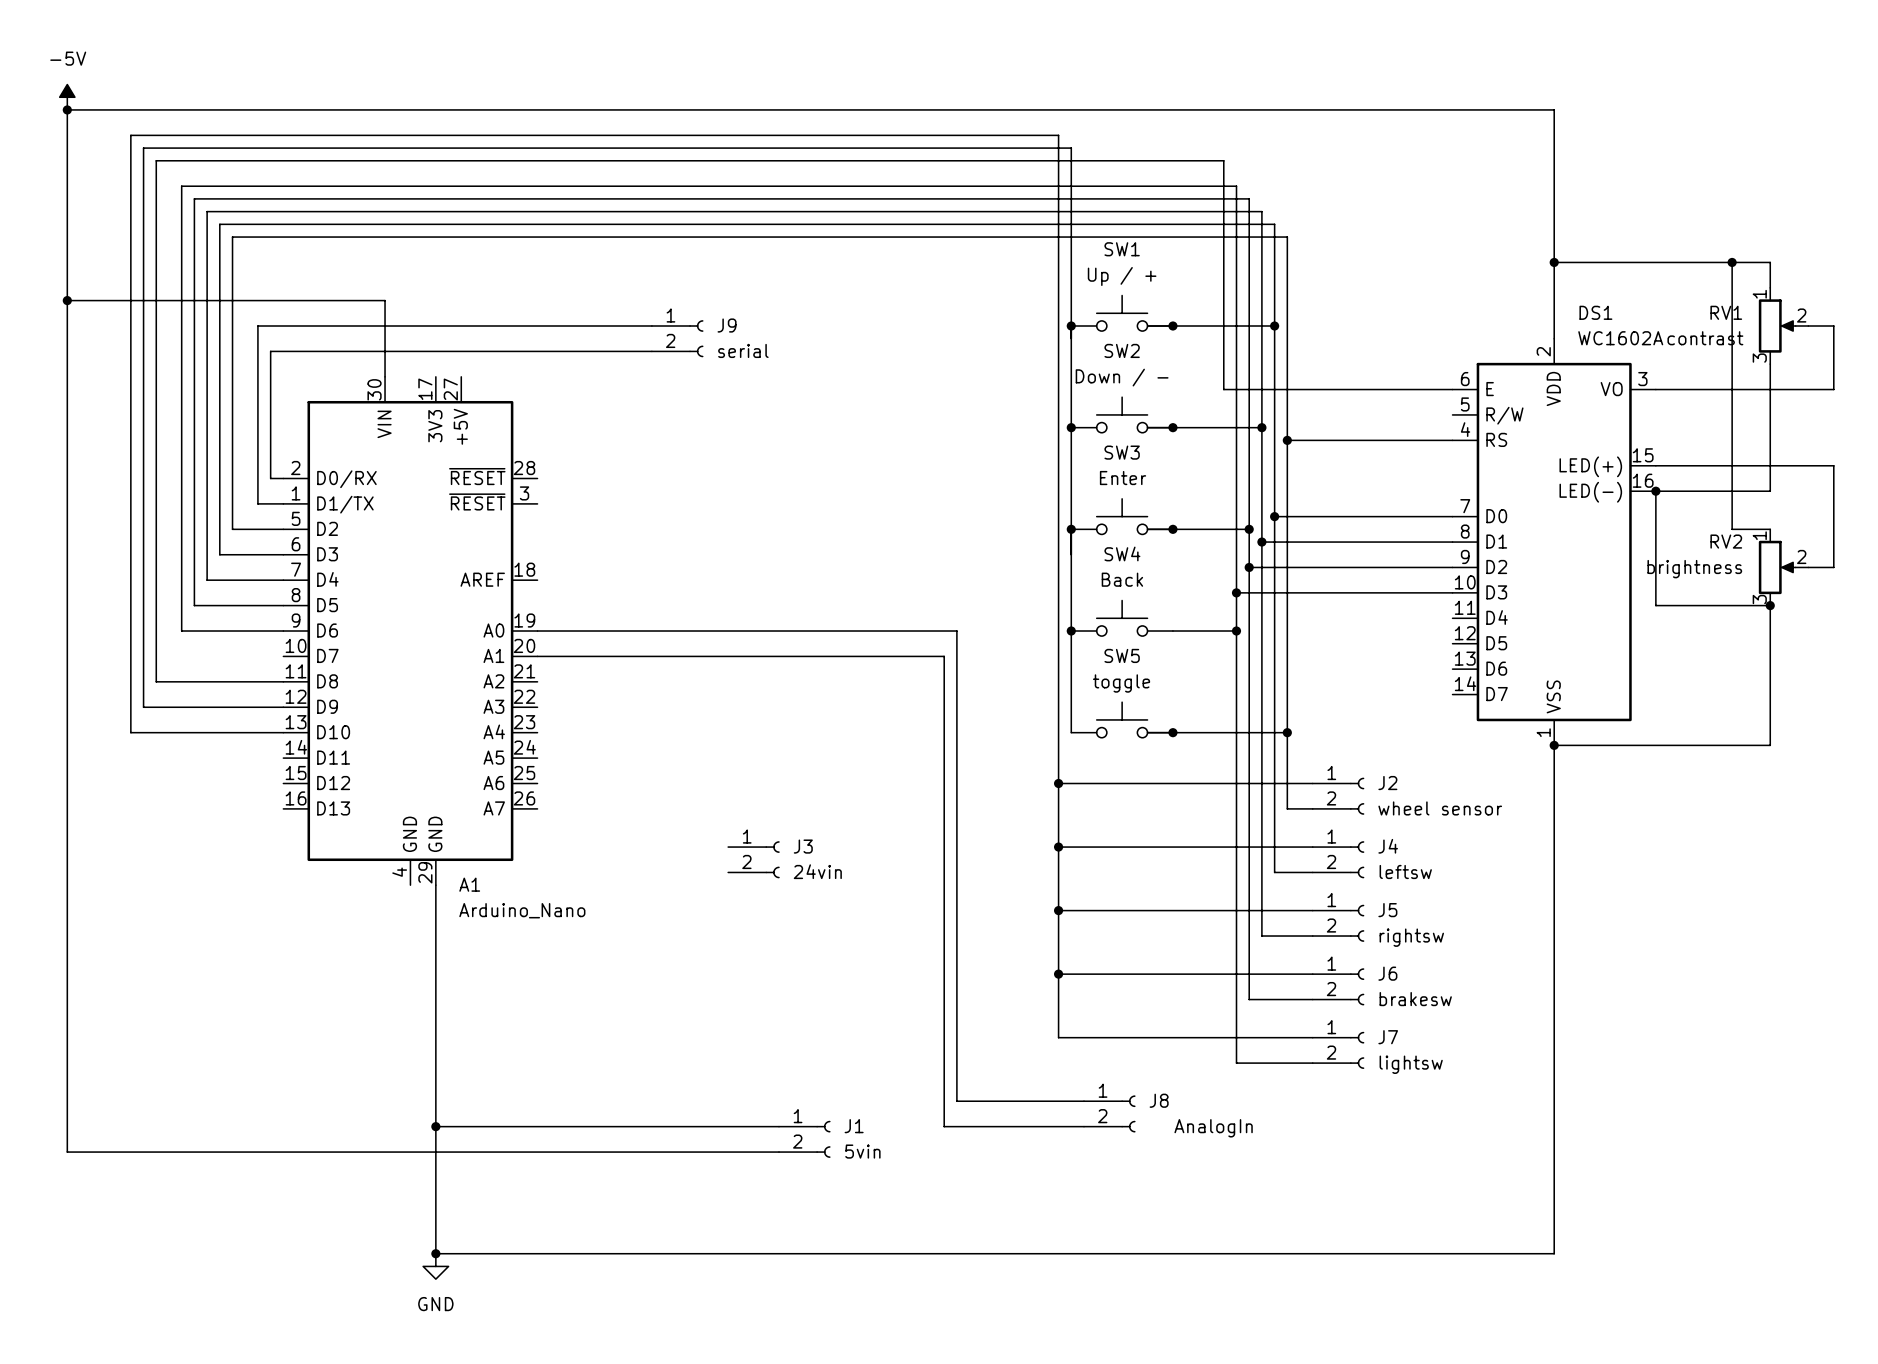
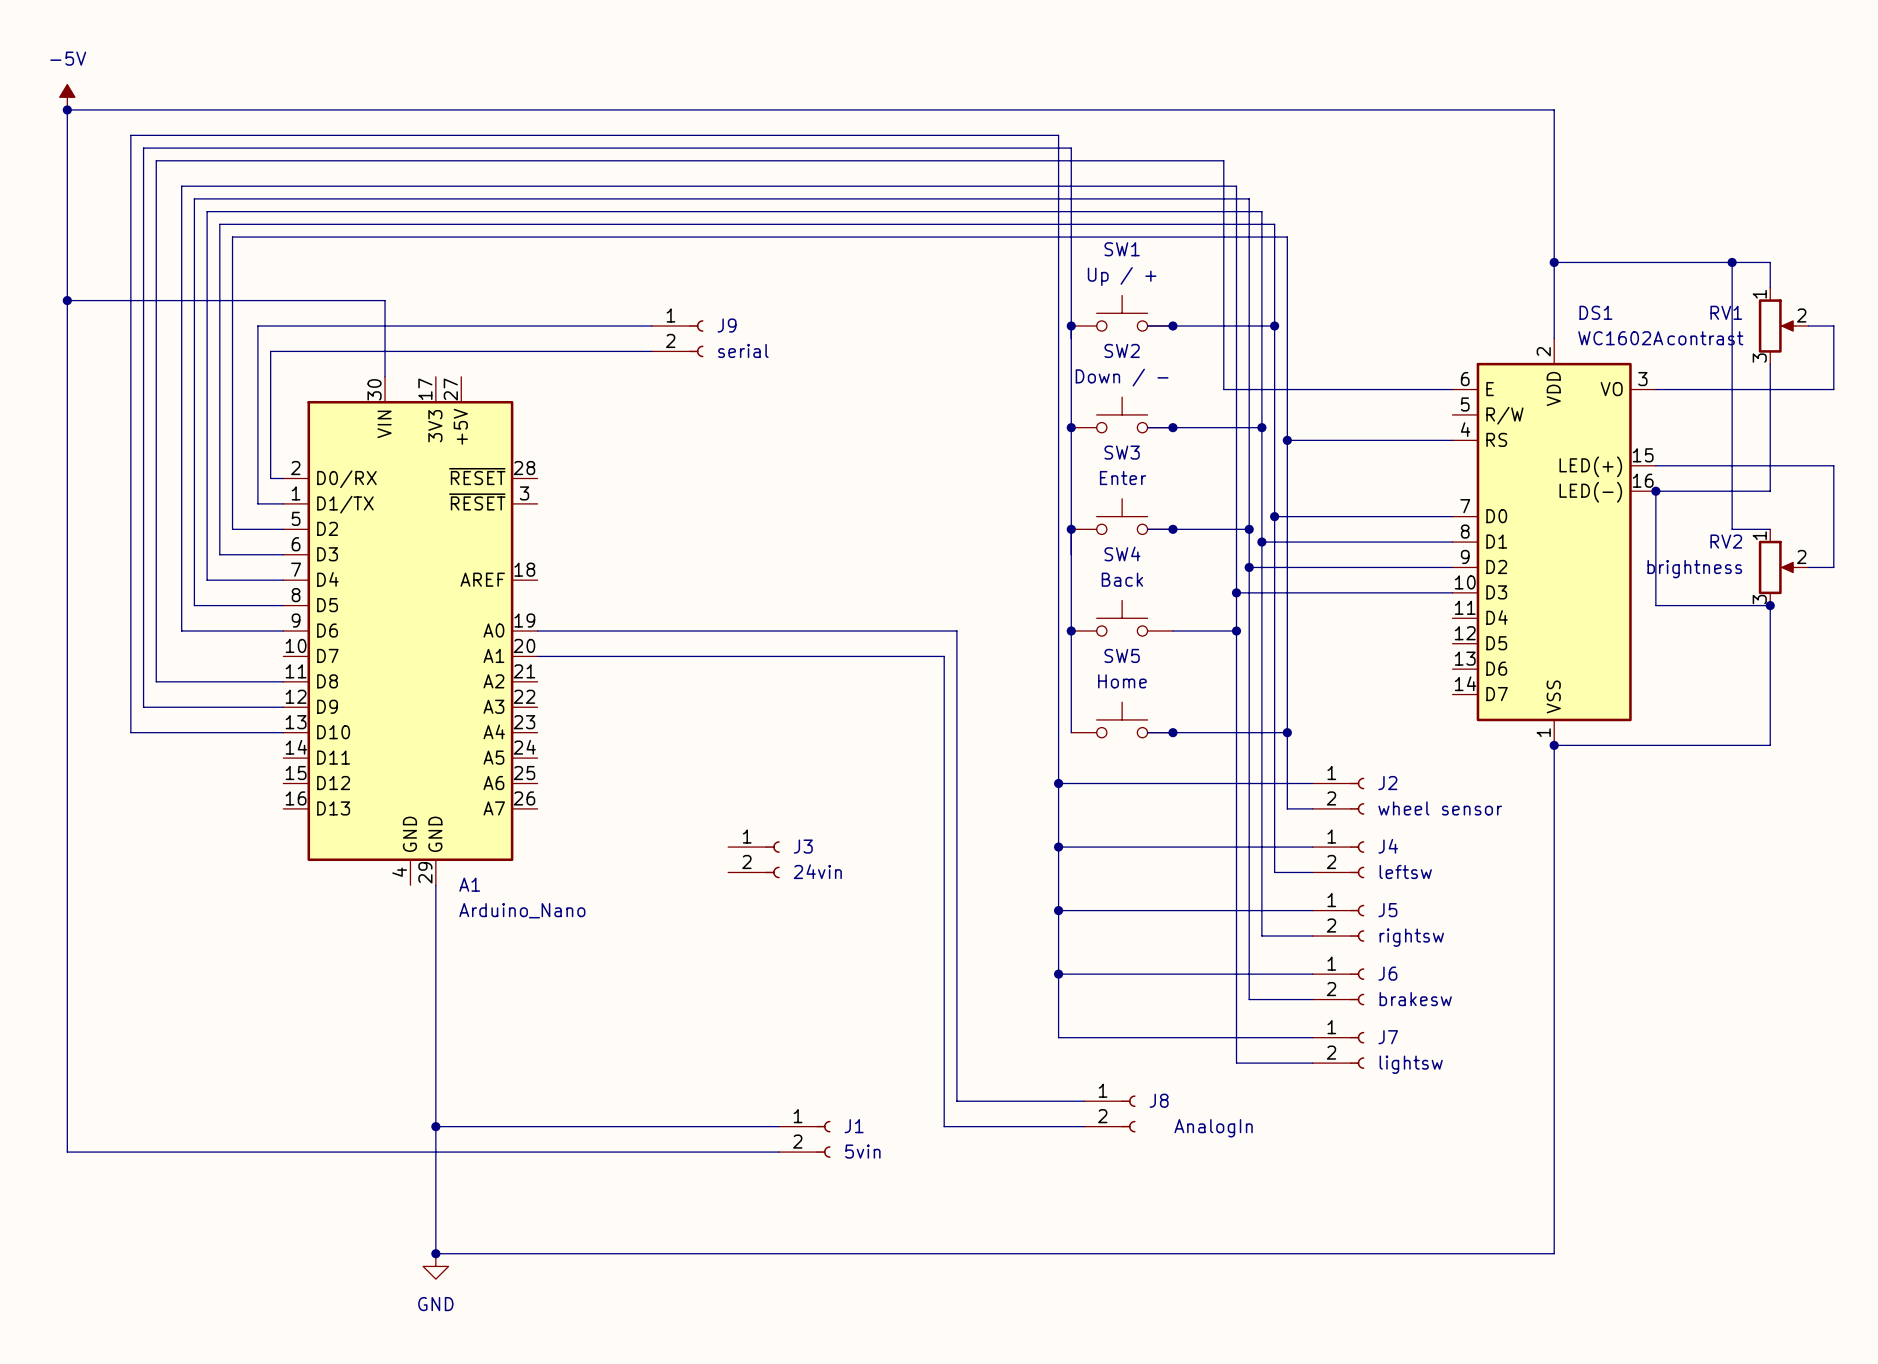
SW5 value: toggle (1121, 683) -> Home (1122, 681)

